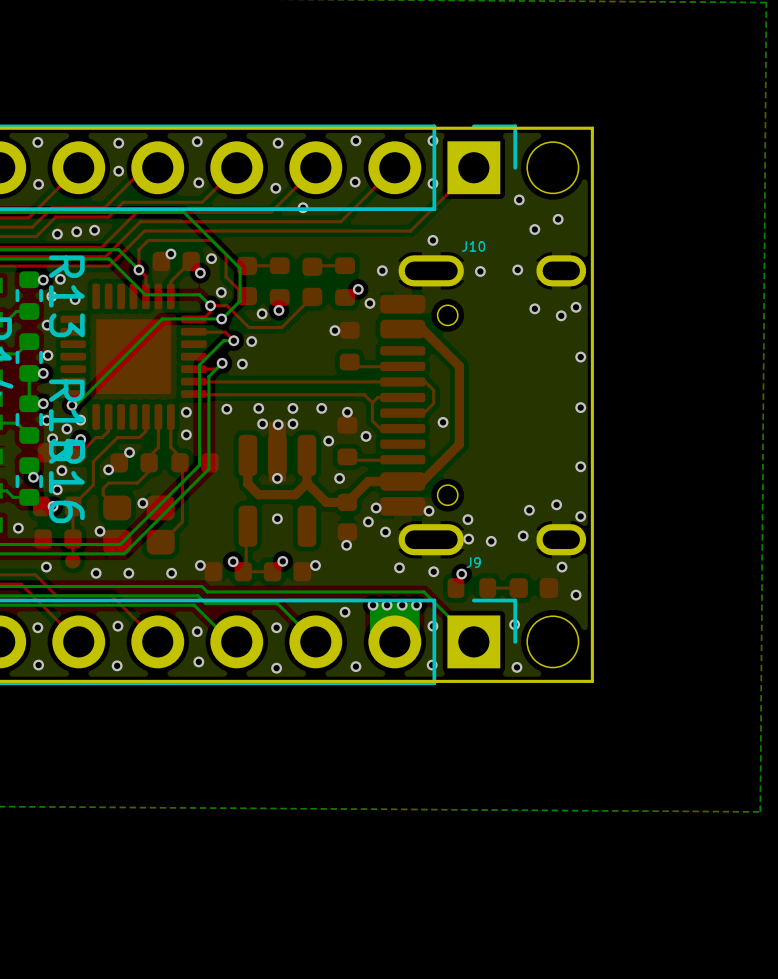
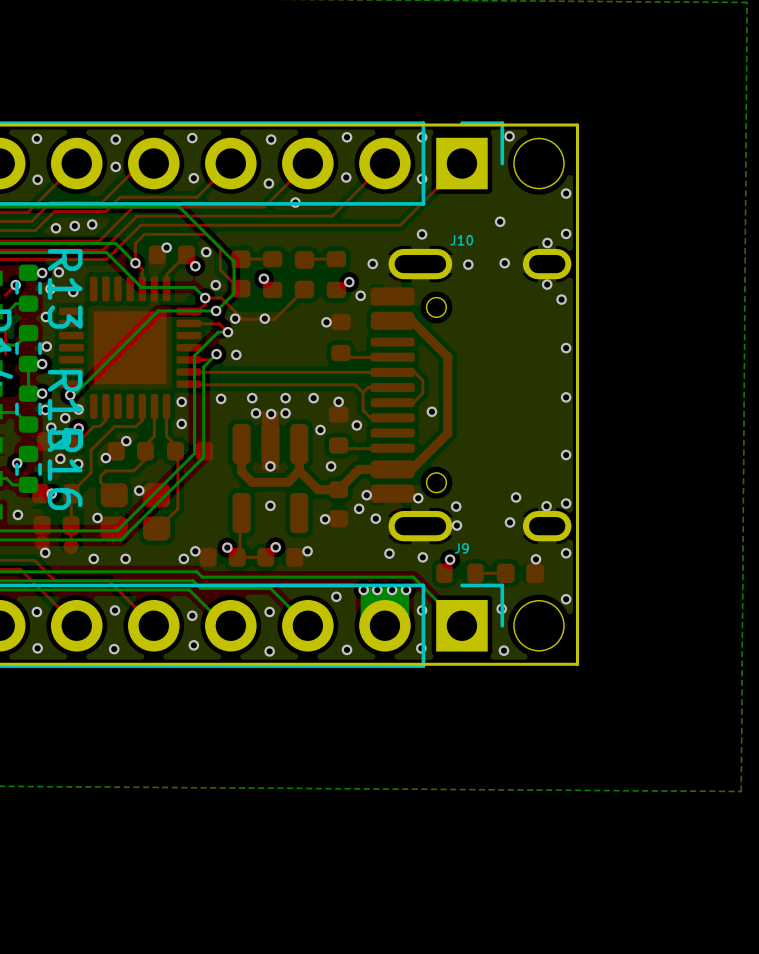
via: none -> (509, 136)
via: none -> (566, 193)
via: (519, 199) -> none
via: (558, 219) -> none
via: none -> (500, 221)
via: (534, 229) -> none
via: none -> (566, 233)
via: none -> (547, 243)
via: none -> (263, 278)
via: none -> (547, 284)
top track: none -> (15, 285) (5, 295)
via: none -> (15, 285)
via: (534, 308) -> none
via: (278, 310) -> none
via: (262, 313) -> none
via: (561, 315) -> none
via: none -> (235, 318)
via: none -> (264, 318)
top track: none -> (5, 326) (5, 354)
via: (251, 341) -> none
via: none -> (78, 464)
via position: (33, 477) -> (17, 463)
via: (57, 489) -> none
via position: (556, 504) -> (546, 506)
via: (491, 541) -> none
via position: (346, 545) -> (325, 519)
part: none -> (42, 542)
via: (562, 567) -> none
via: none -> (566, 553)
via position: (171, 573) -> (183, 558)
via: none -> (535, 559)
via: (576, 595) -> none
via: none -> (566, 599)

